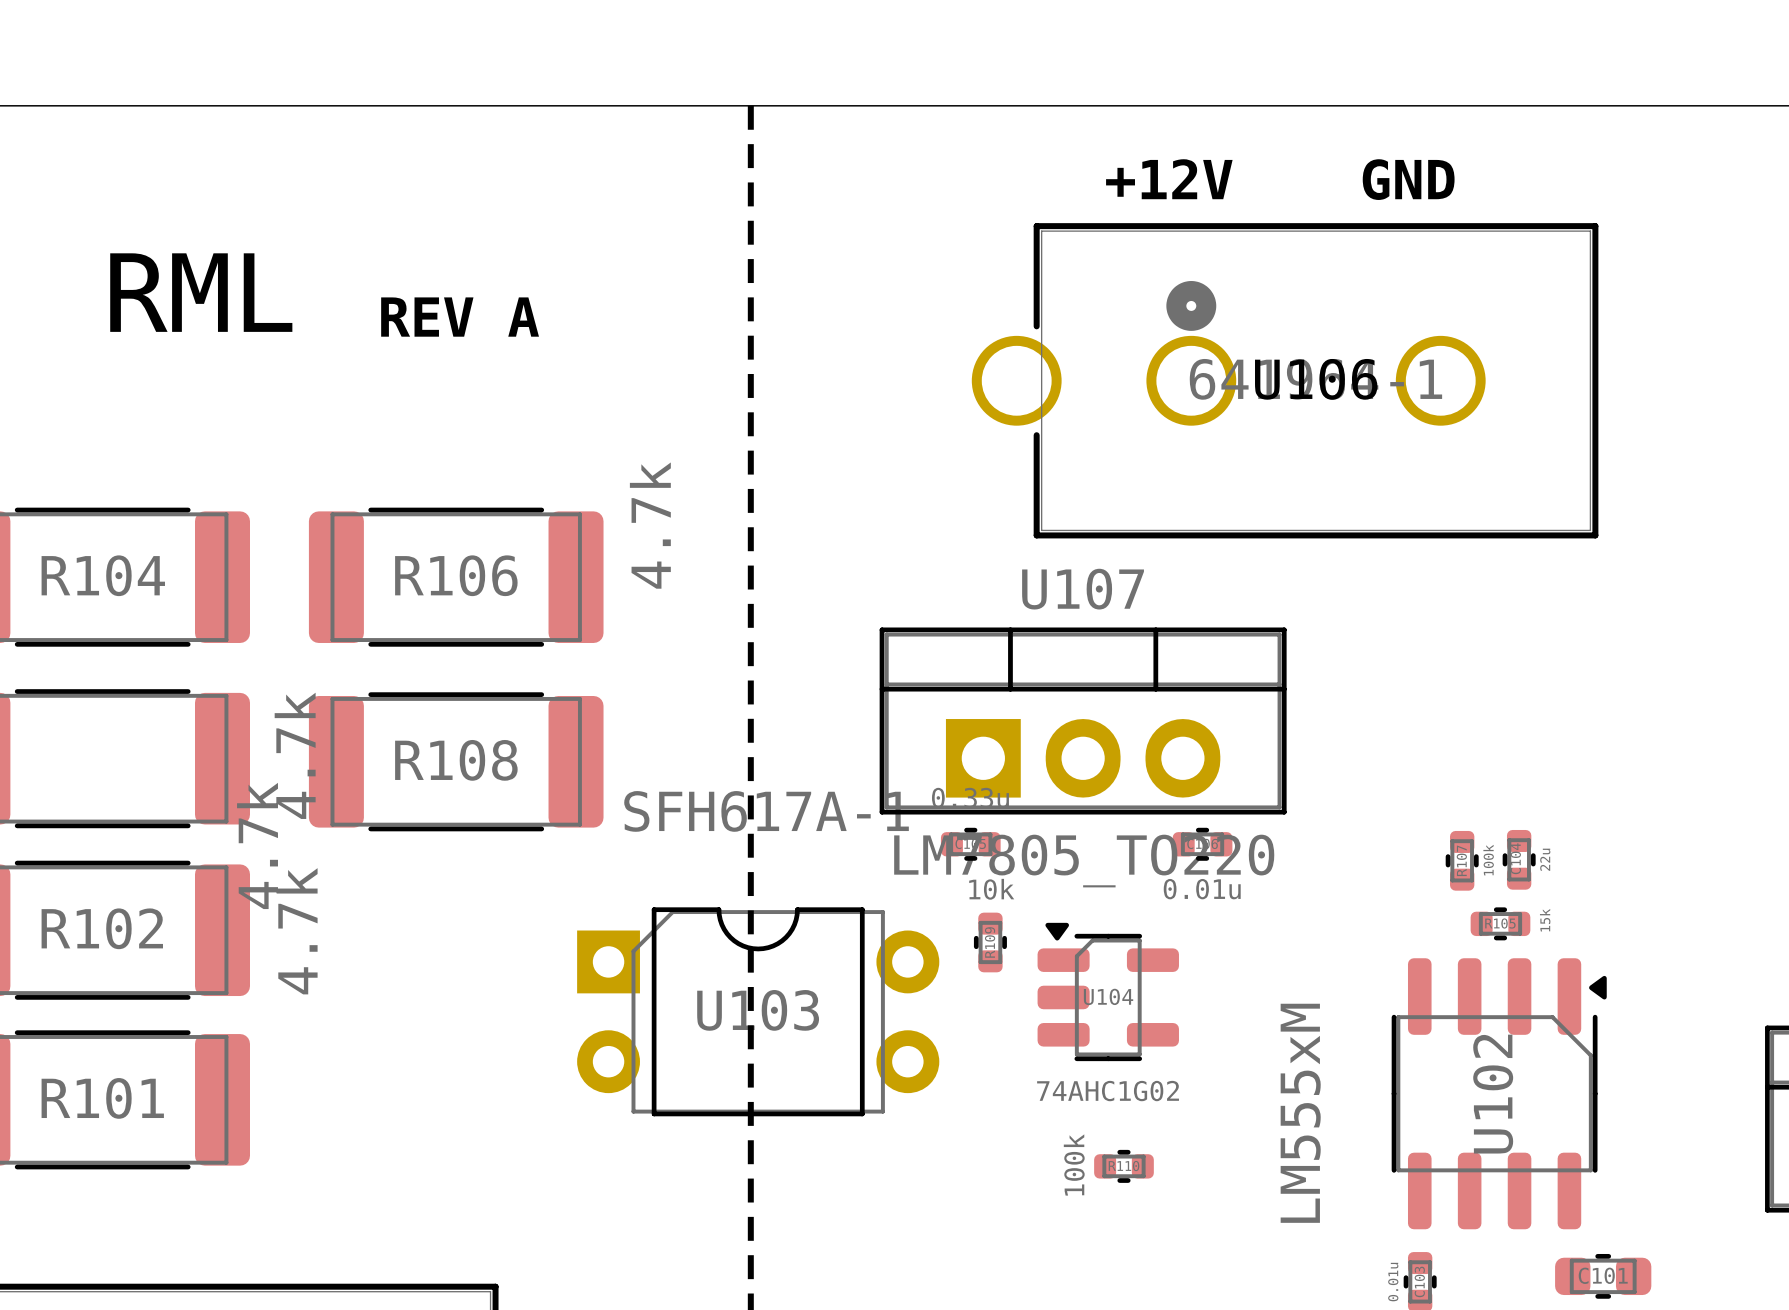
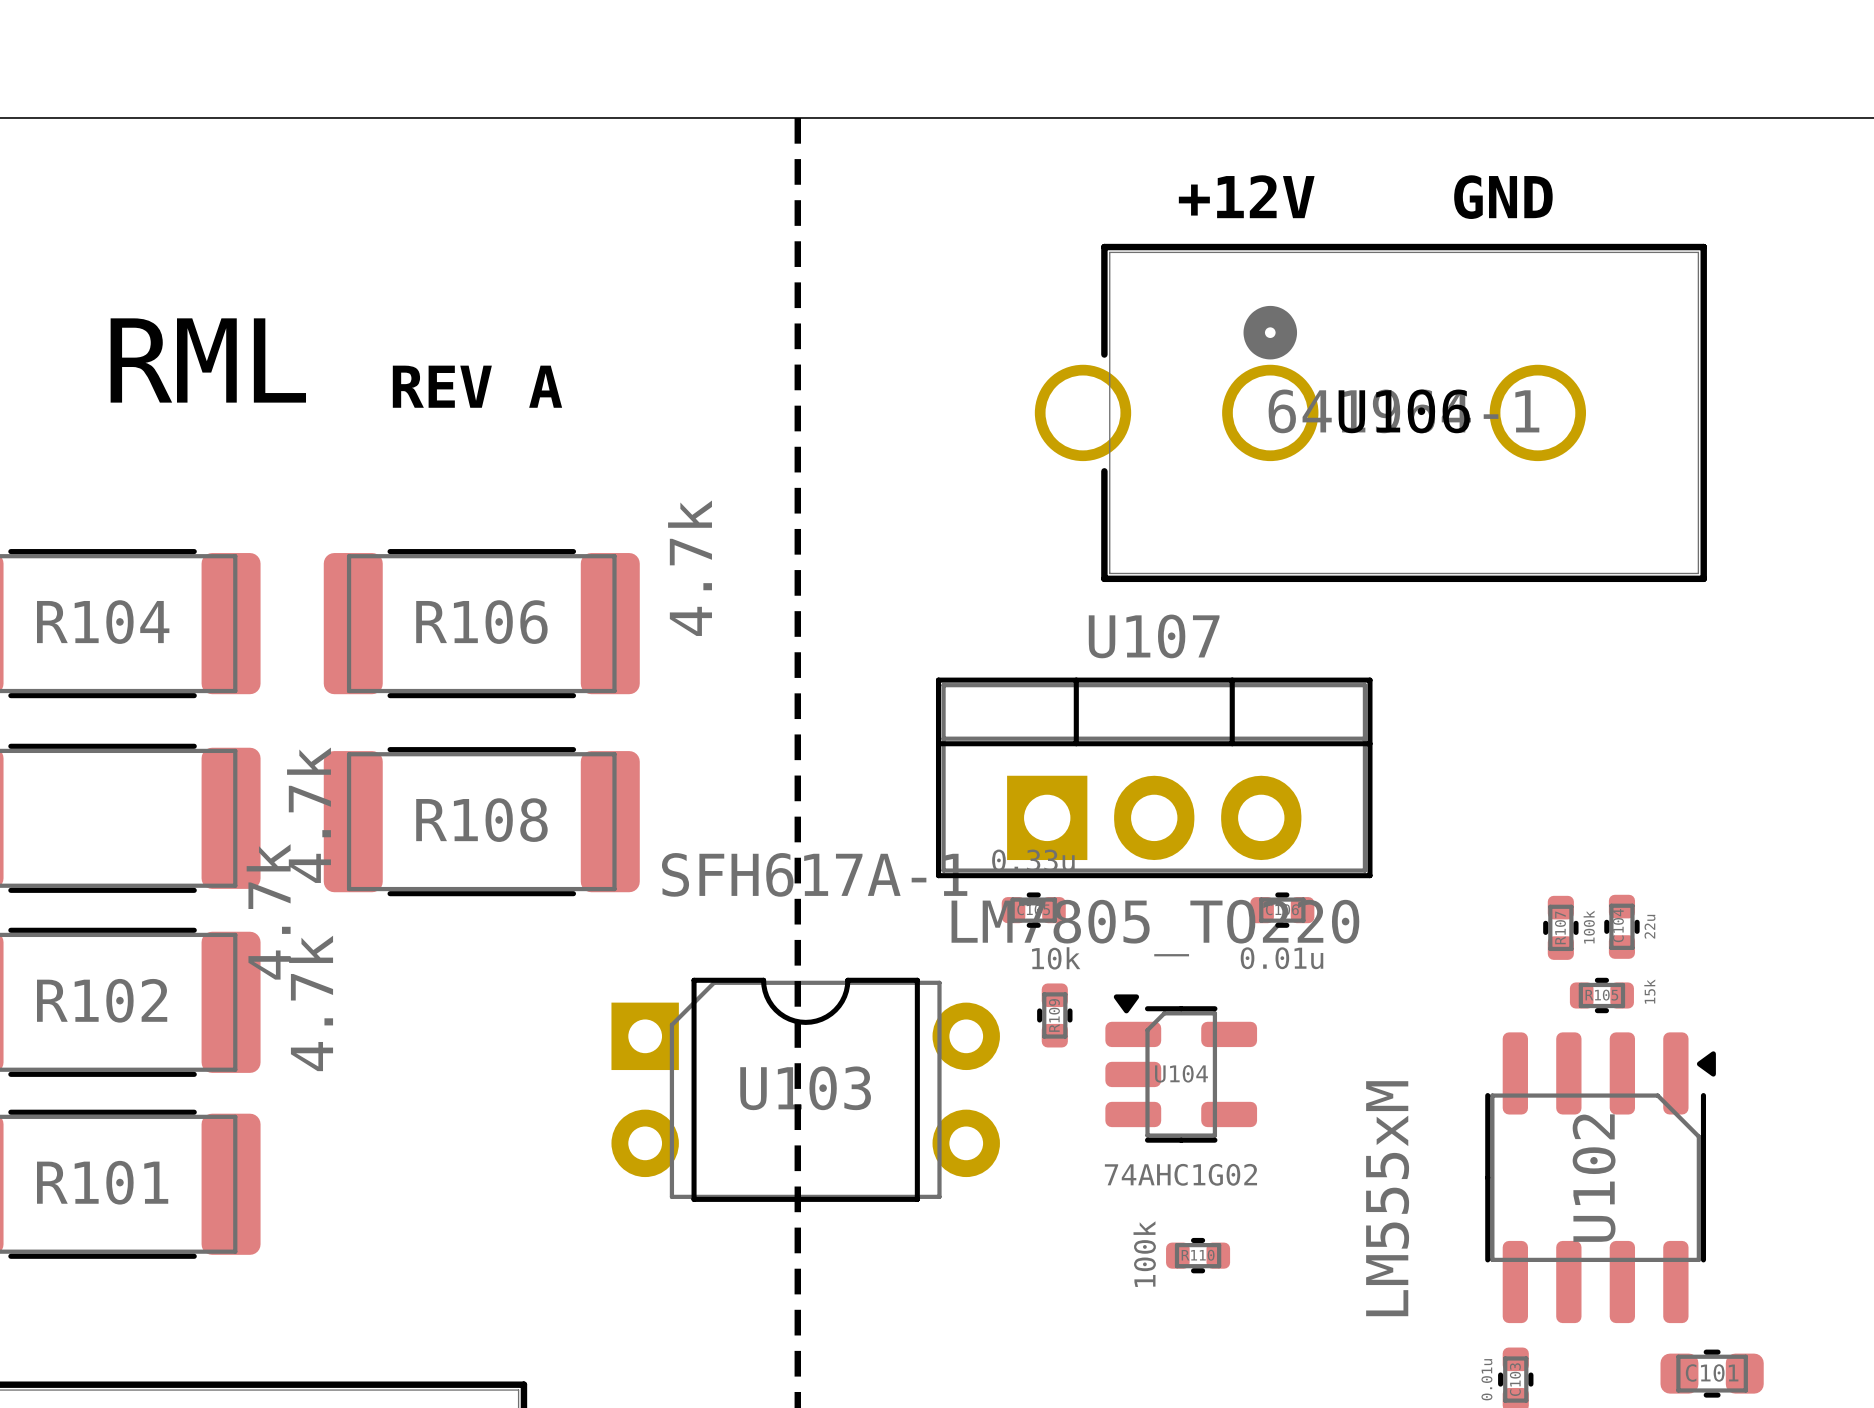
text position: RML (201, 292) -> RML (208, 360)
text position: REV A (460, 317) -> REV A (477, 386)

